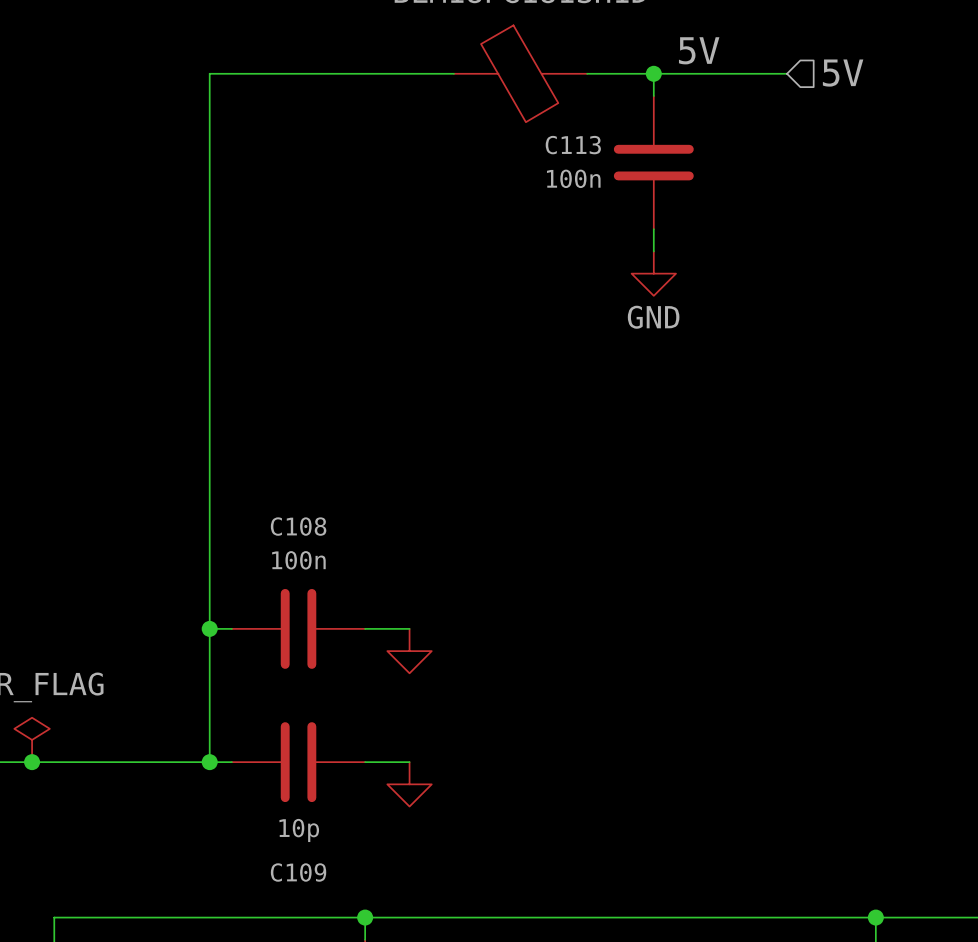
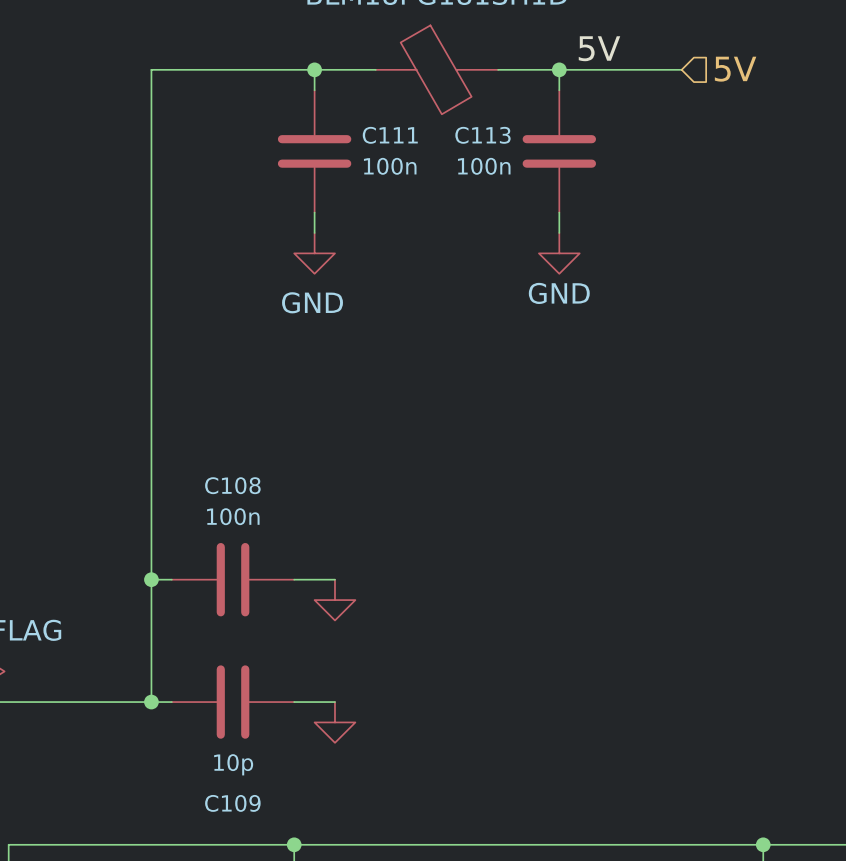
wire: none -> (314, 69) (314, 90)
junction: none -> (314, 69)
C111: none -> 100n (314, 151)
wire: none -> (314, 212) (314, 232)
power symbol: none -> GND (314, 253)

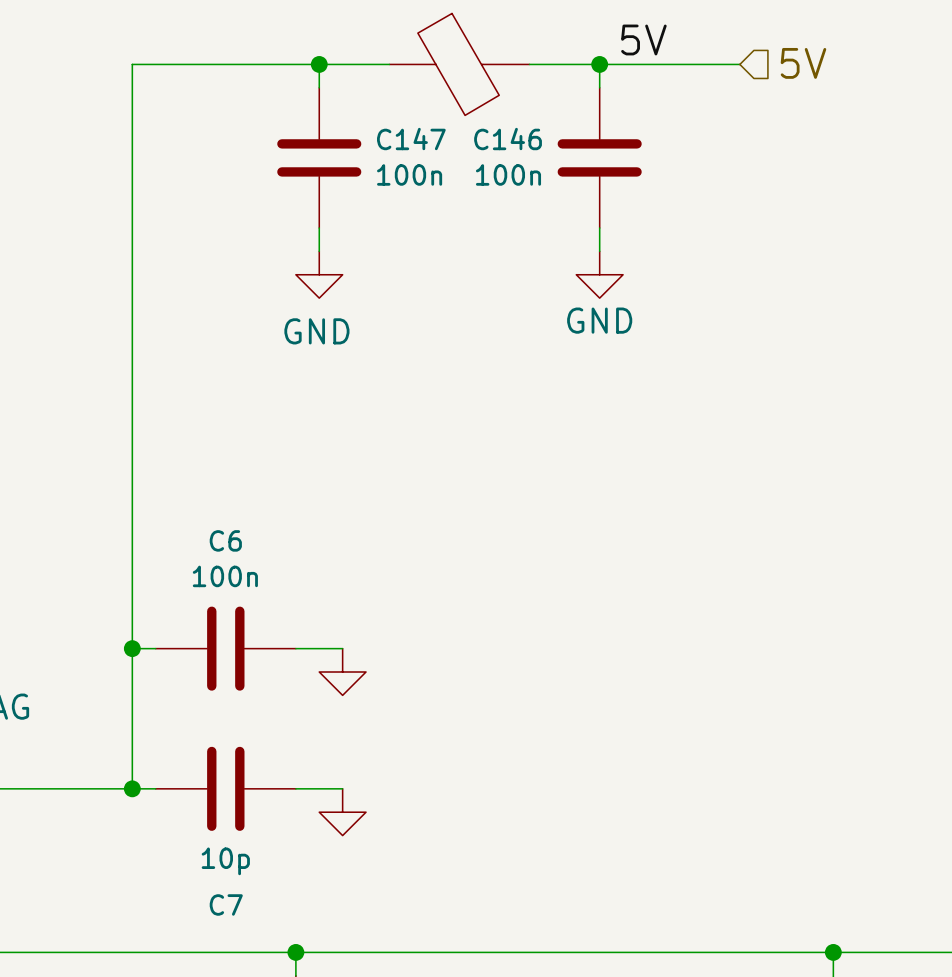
C111 name: C111 (390, 135) -> C147 (411, 139)
C113 name: C113 (482, 135) -> C146 (508, 139)
C108 name: C108 (232, 485) -> C6 (225, 540)
C109 name: C109 (232, 803) -> C7 (226, 904)

